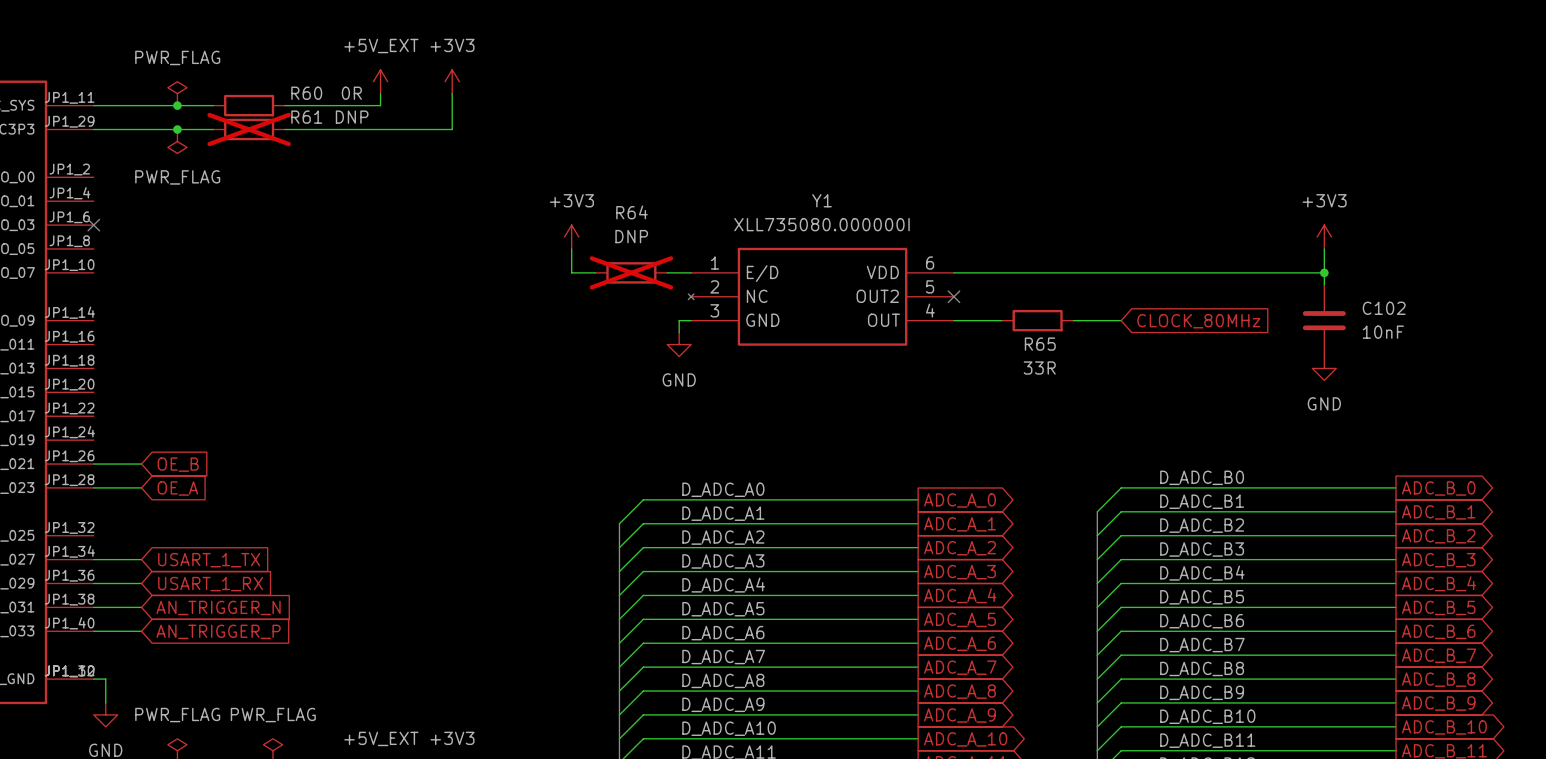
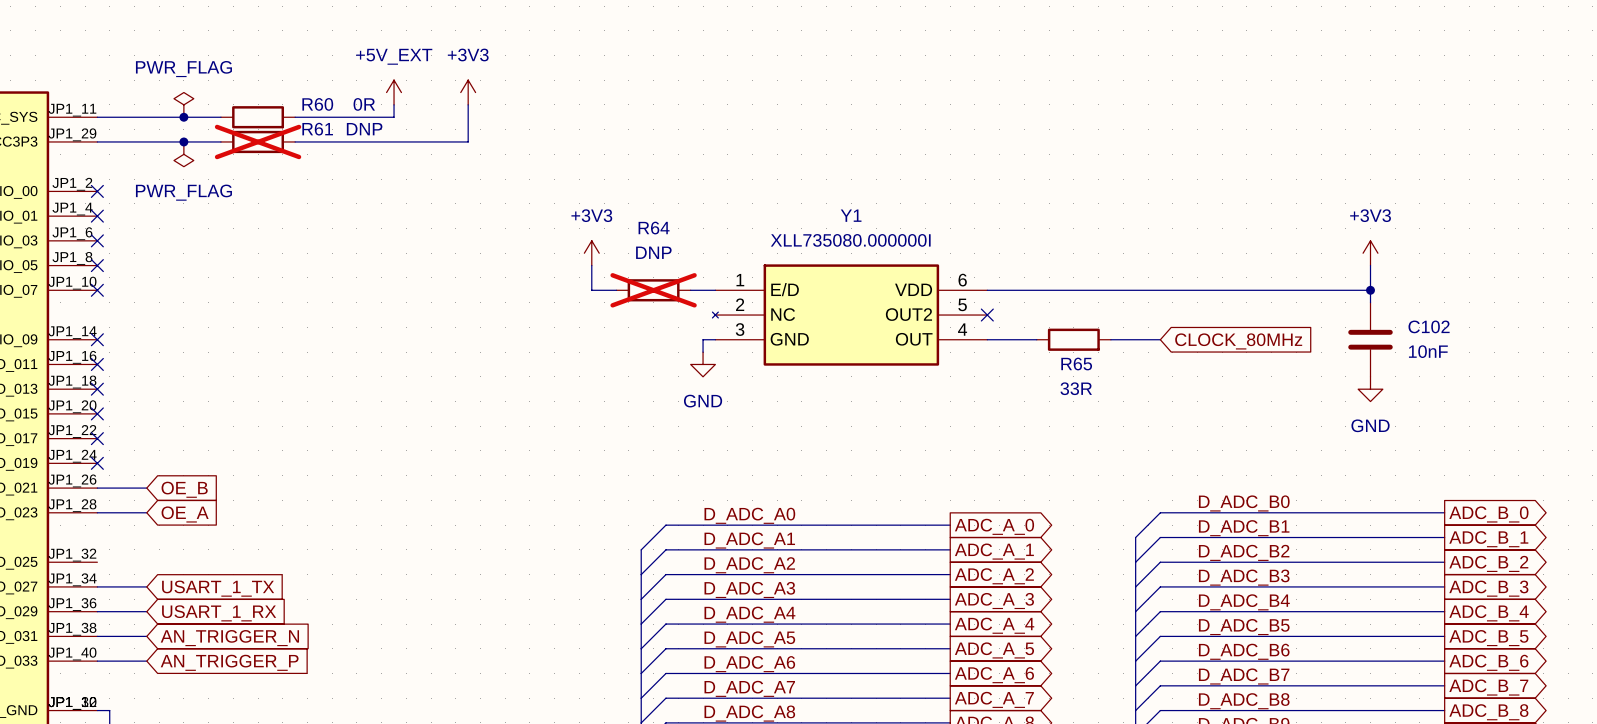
no-connect mark: none -> (97, 191)
no-connect mark: none -> (97, 216)
no-connect mark: none -> (97, 265)
no-connect mark: none -> (97, 290)
no-connect mark: none -> (97, 339)
no-connect mark: none -> (97, 364)
no-connect mark: none -> (97, 389)
no-connect mark: none -> (97, 413)
no-connect mark: none -> (97, 438)
no-connect mark: none -> (97, 463)

